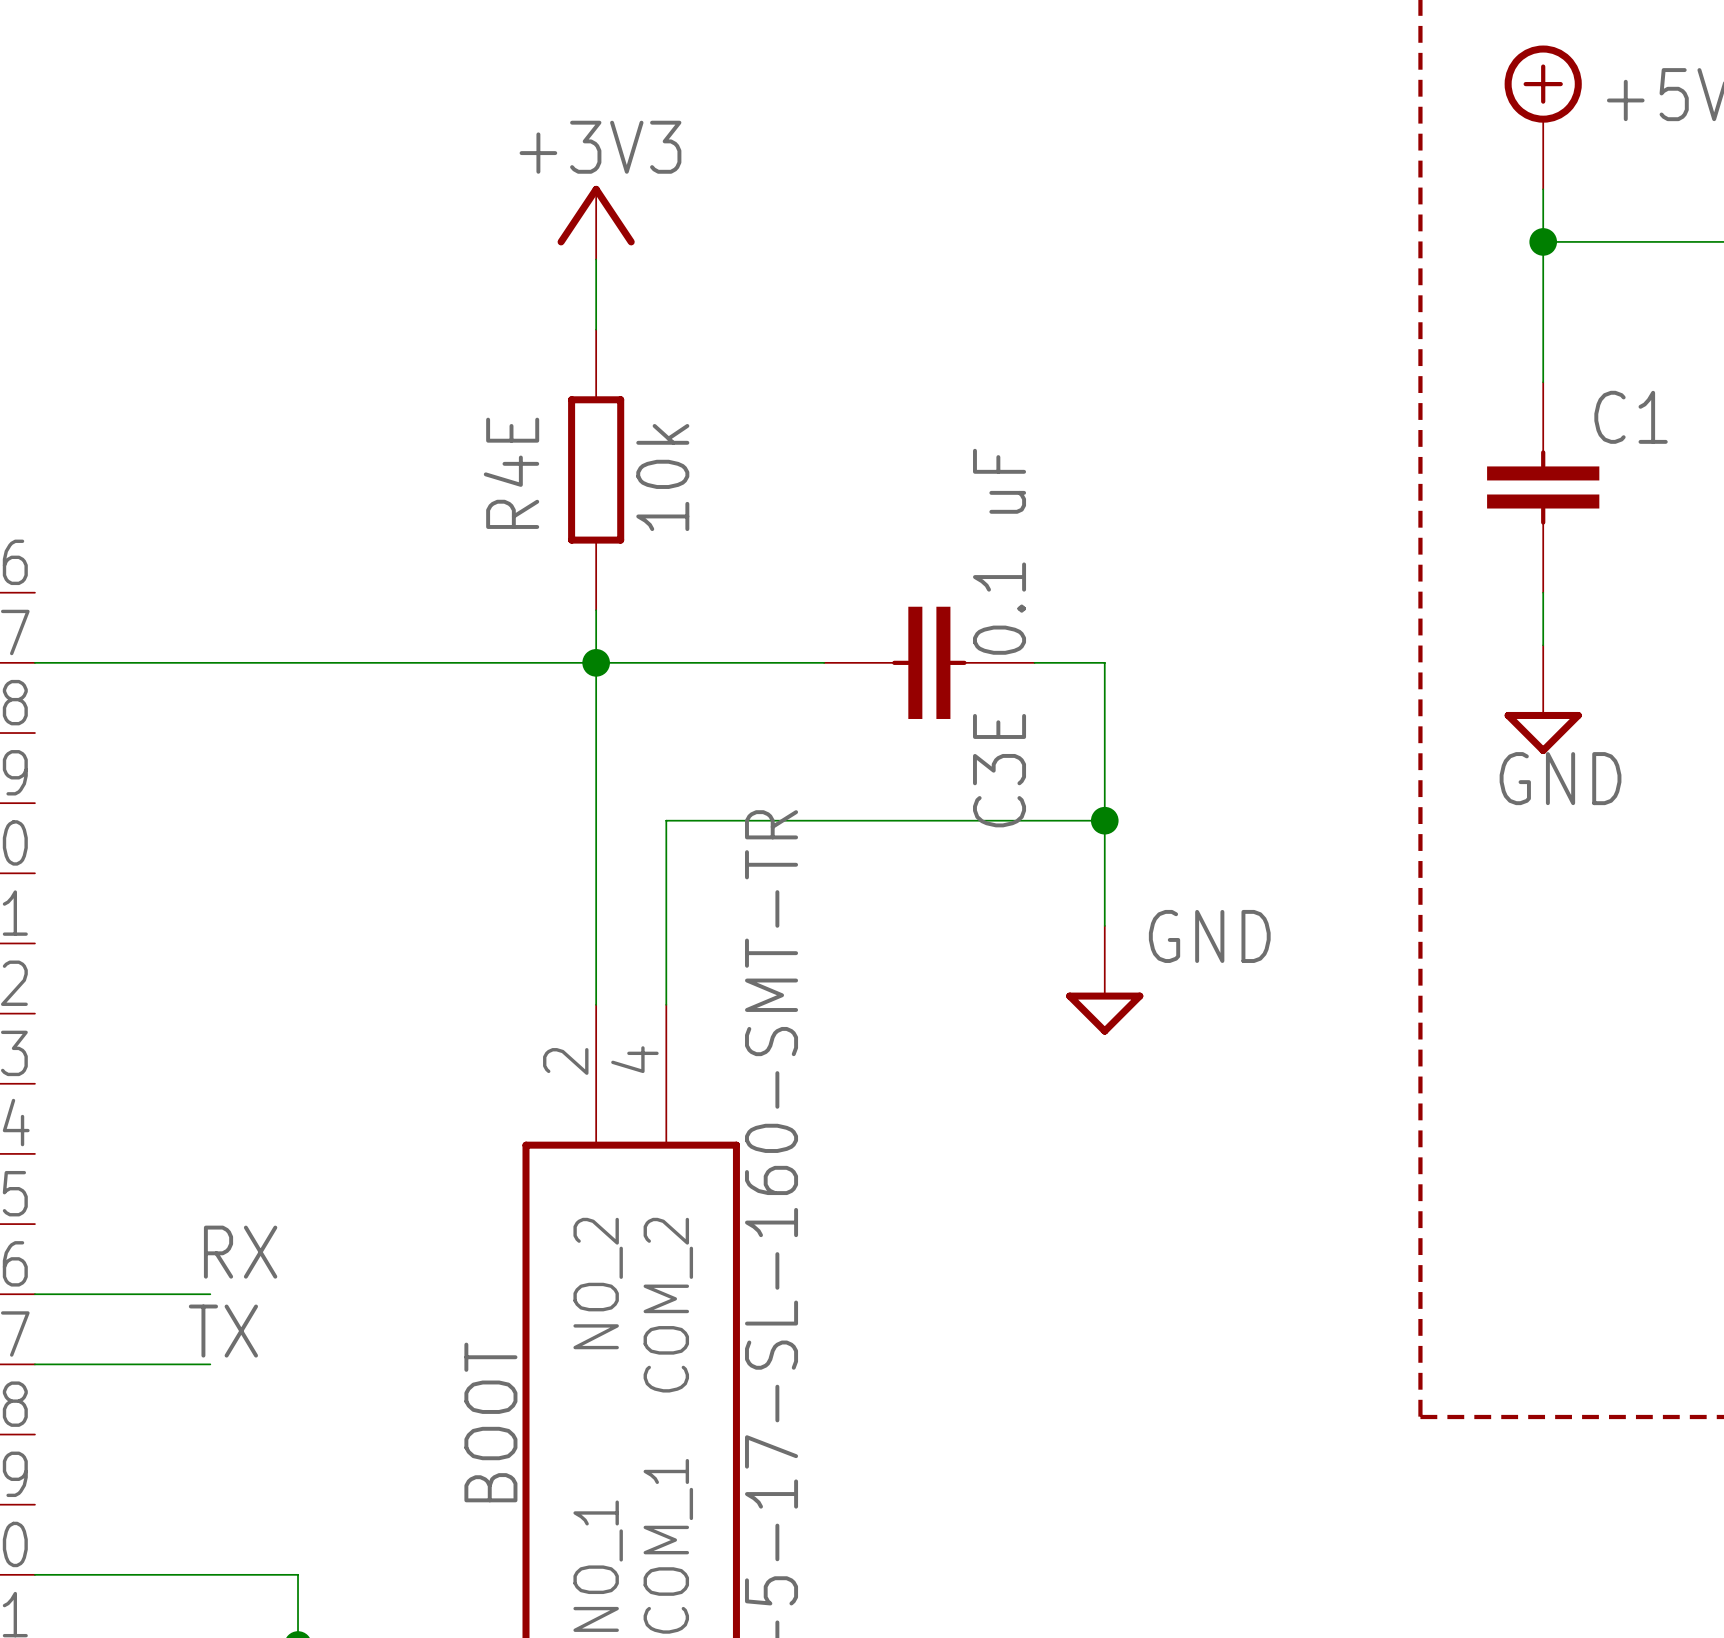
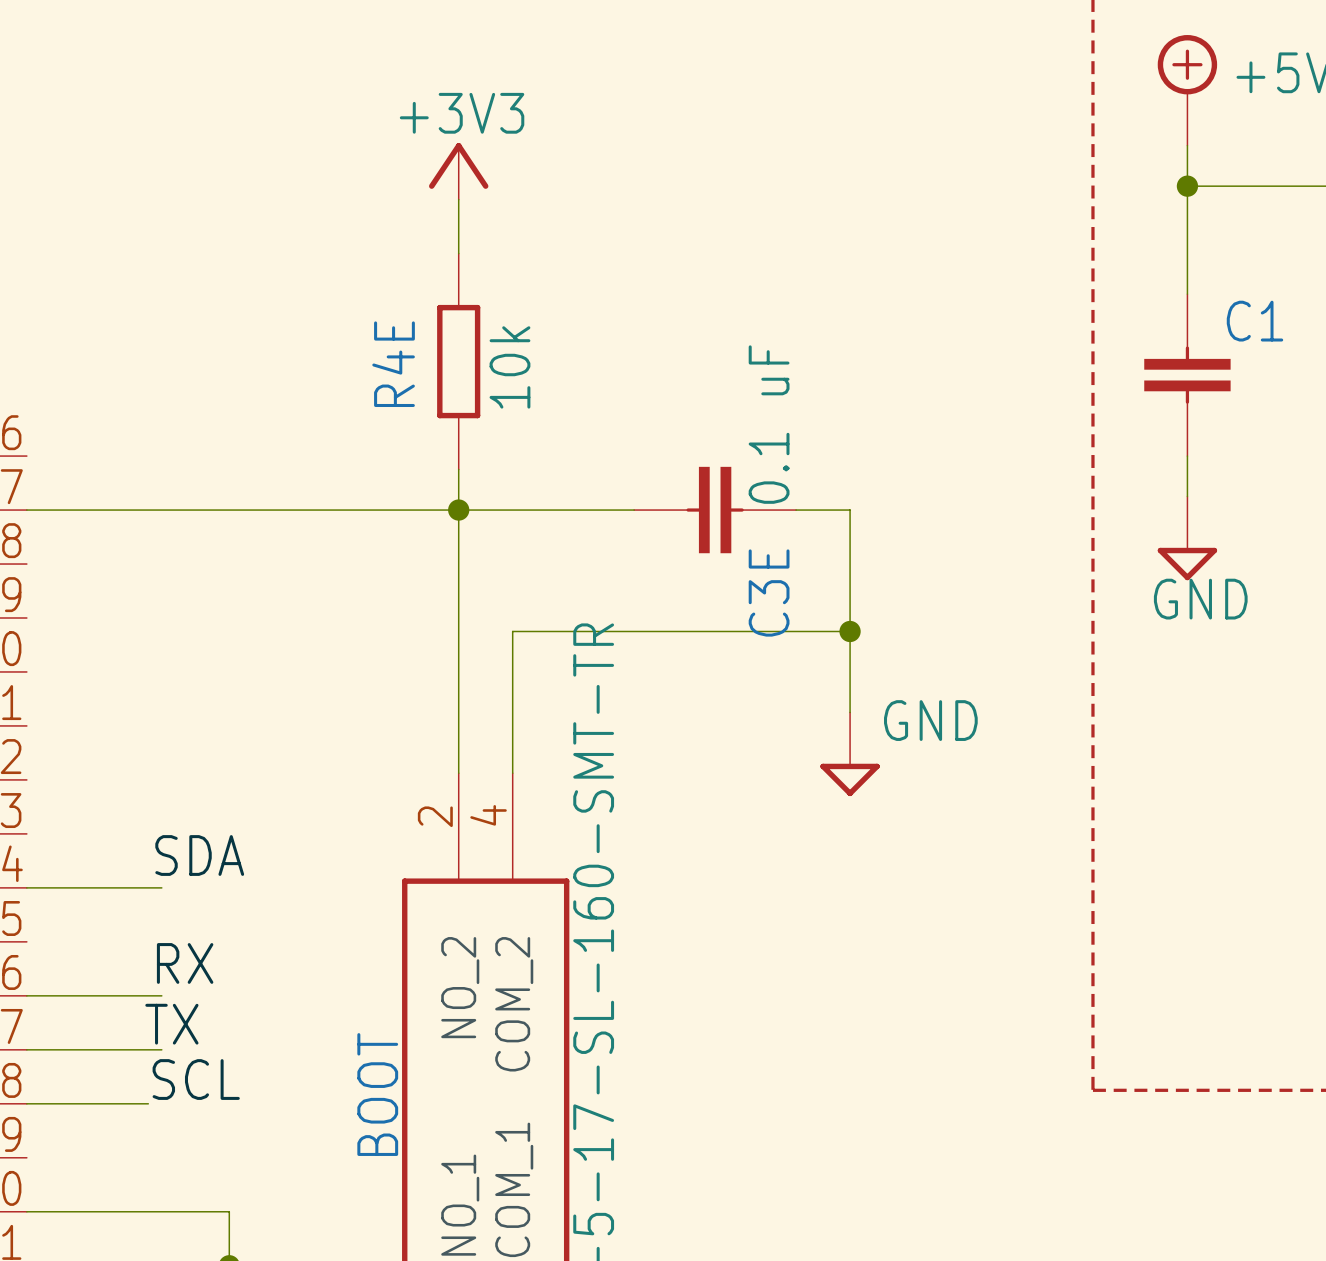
label: none -> SDA (199, 855)
wire: none -> (26, 887) (161, 887)
label: none -> SCL (196, 1079)
wire: none -> (26, 1103) (148, 1103)

